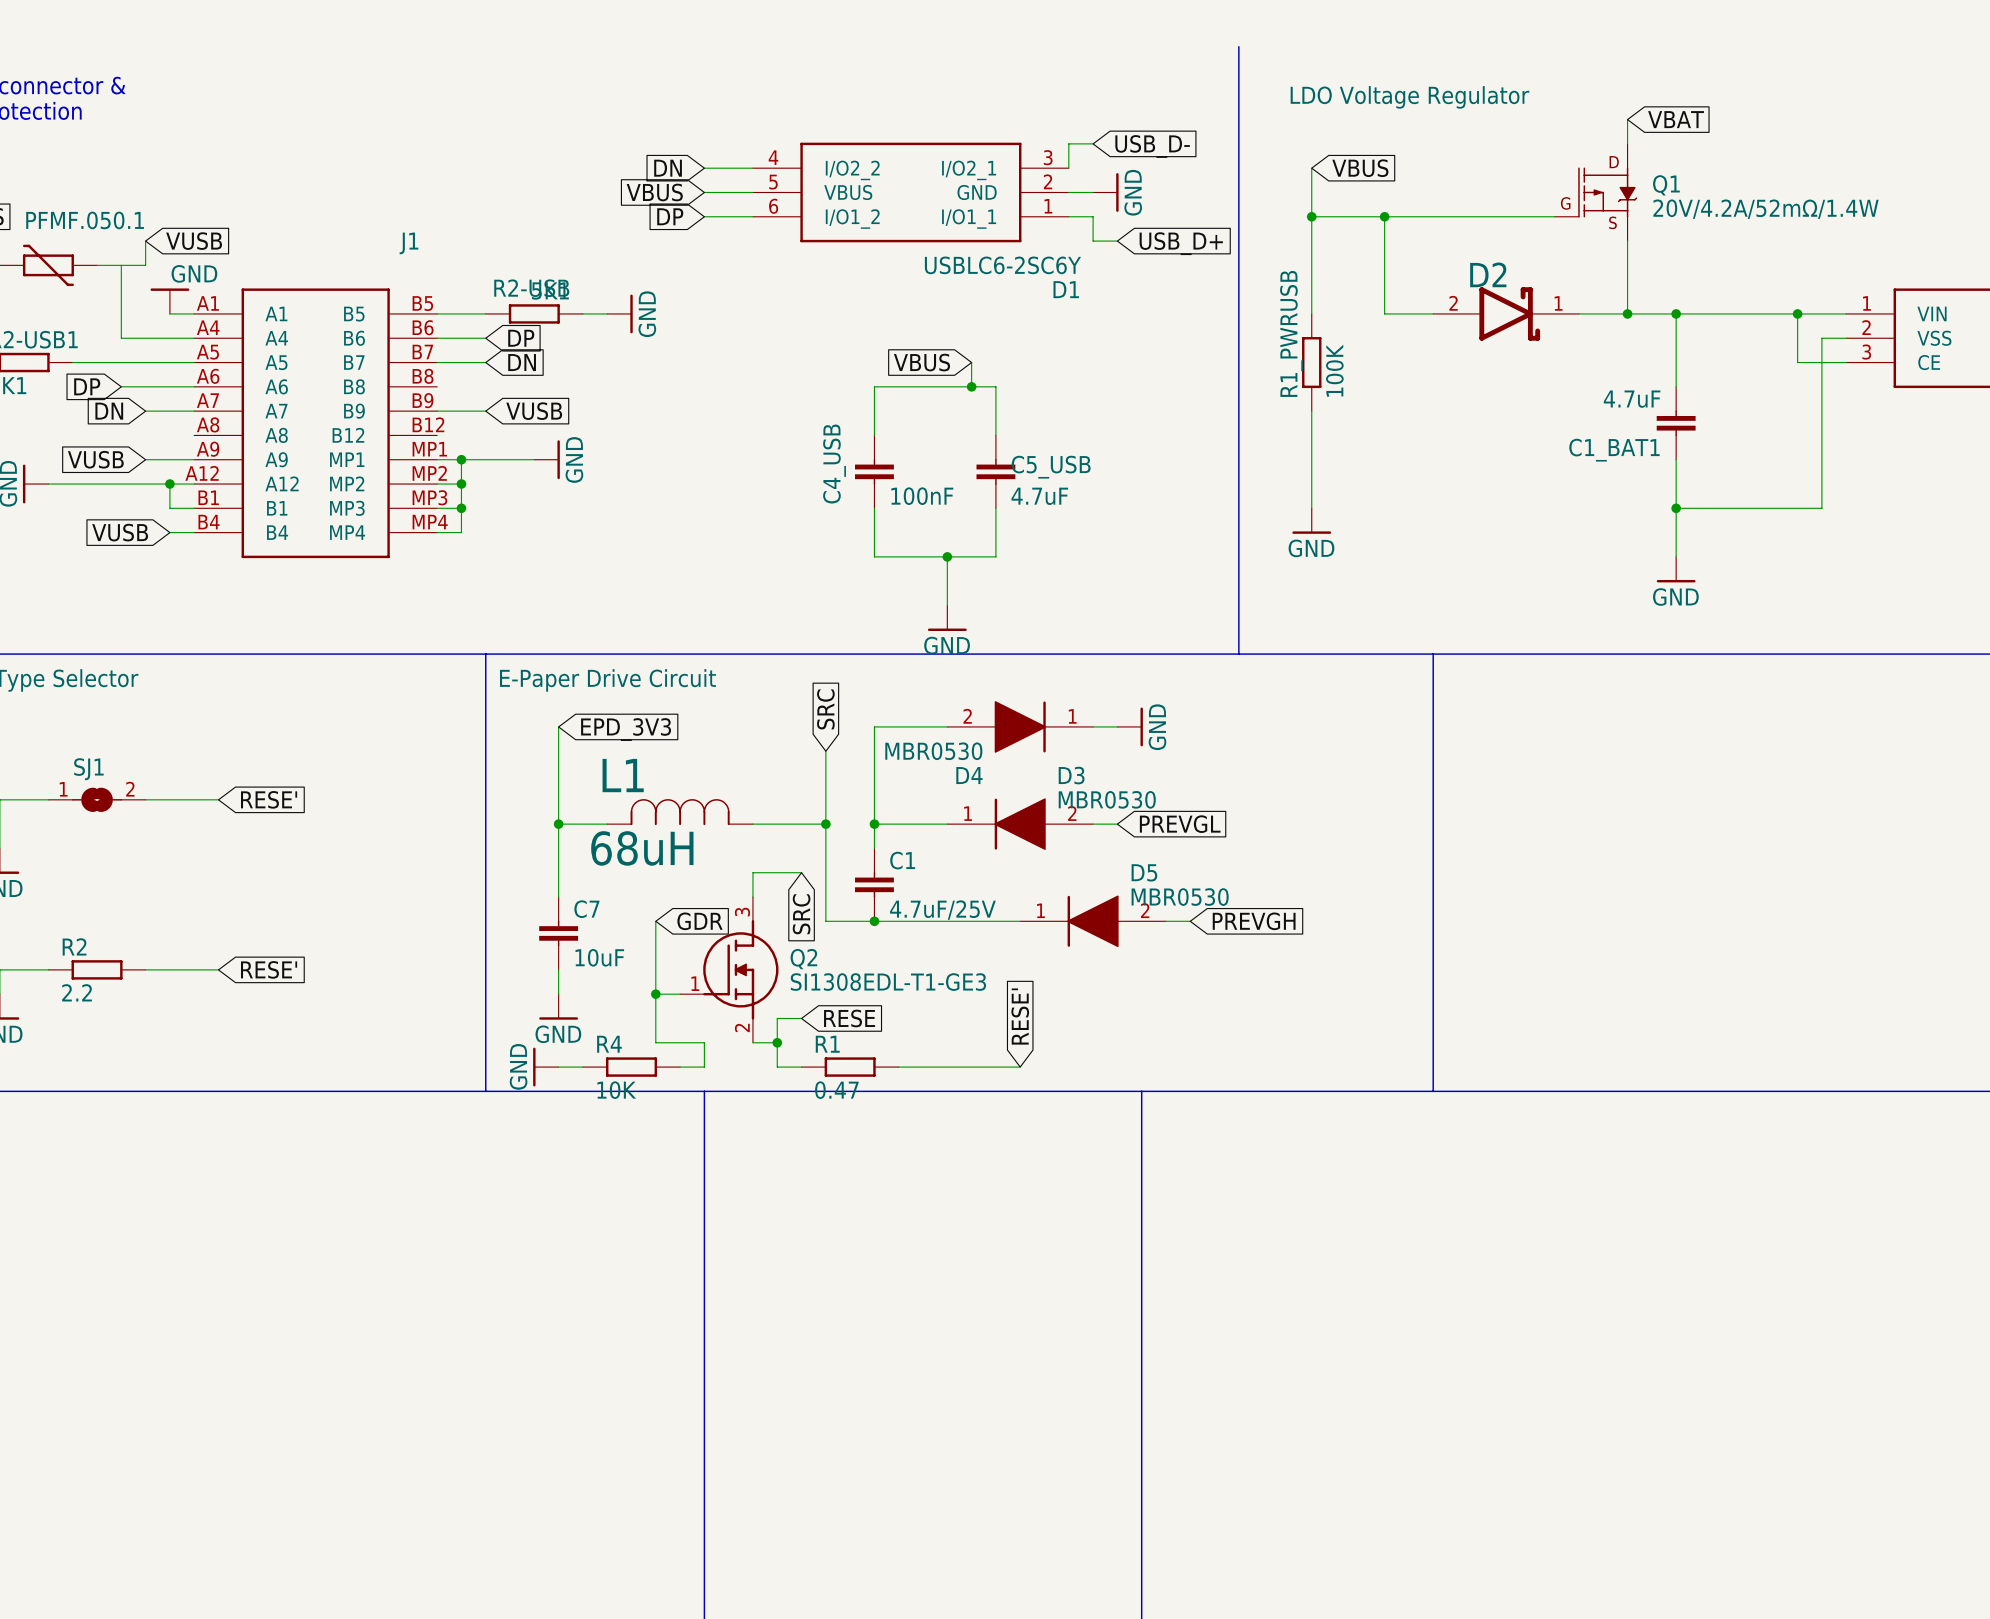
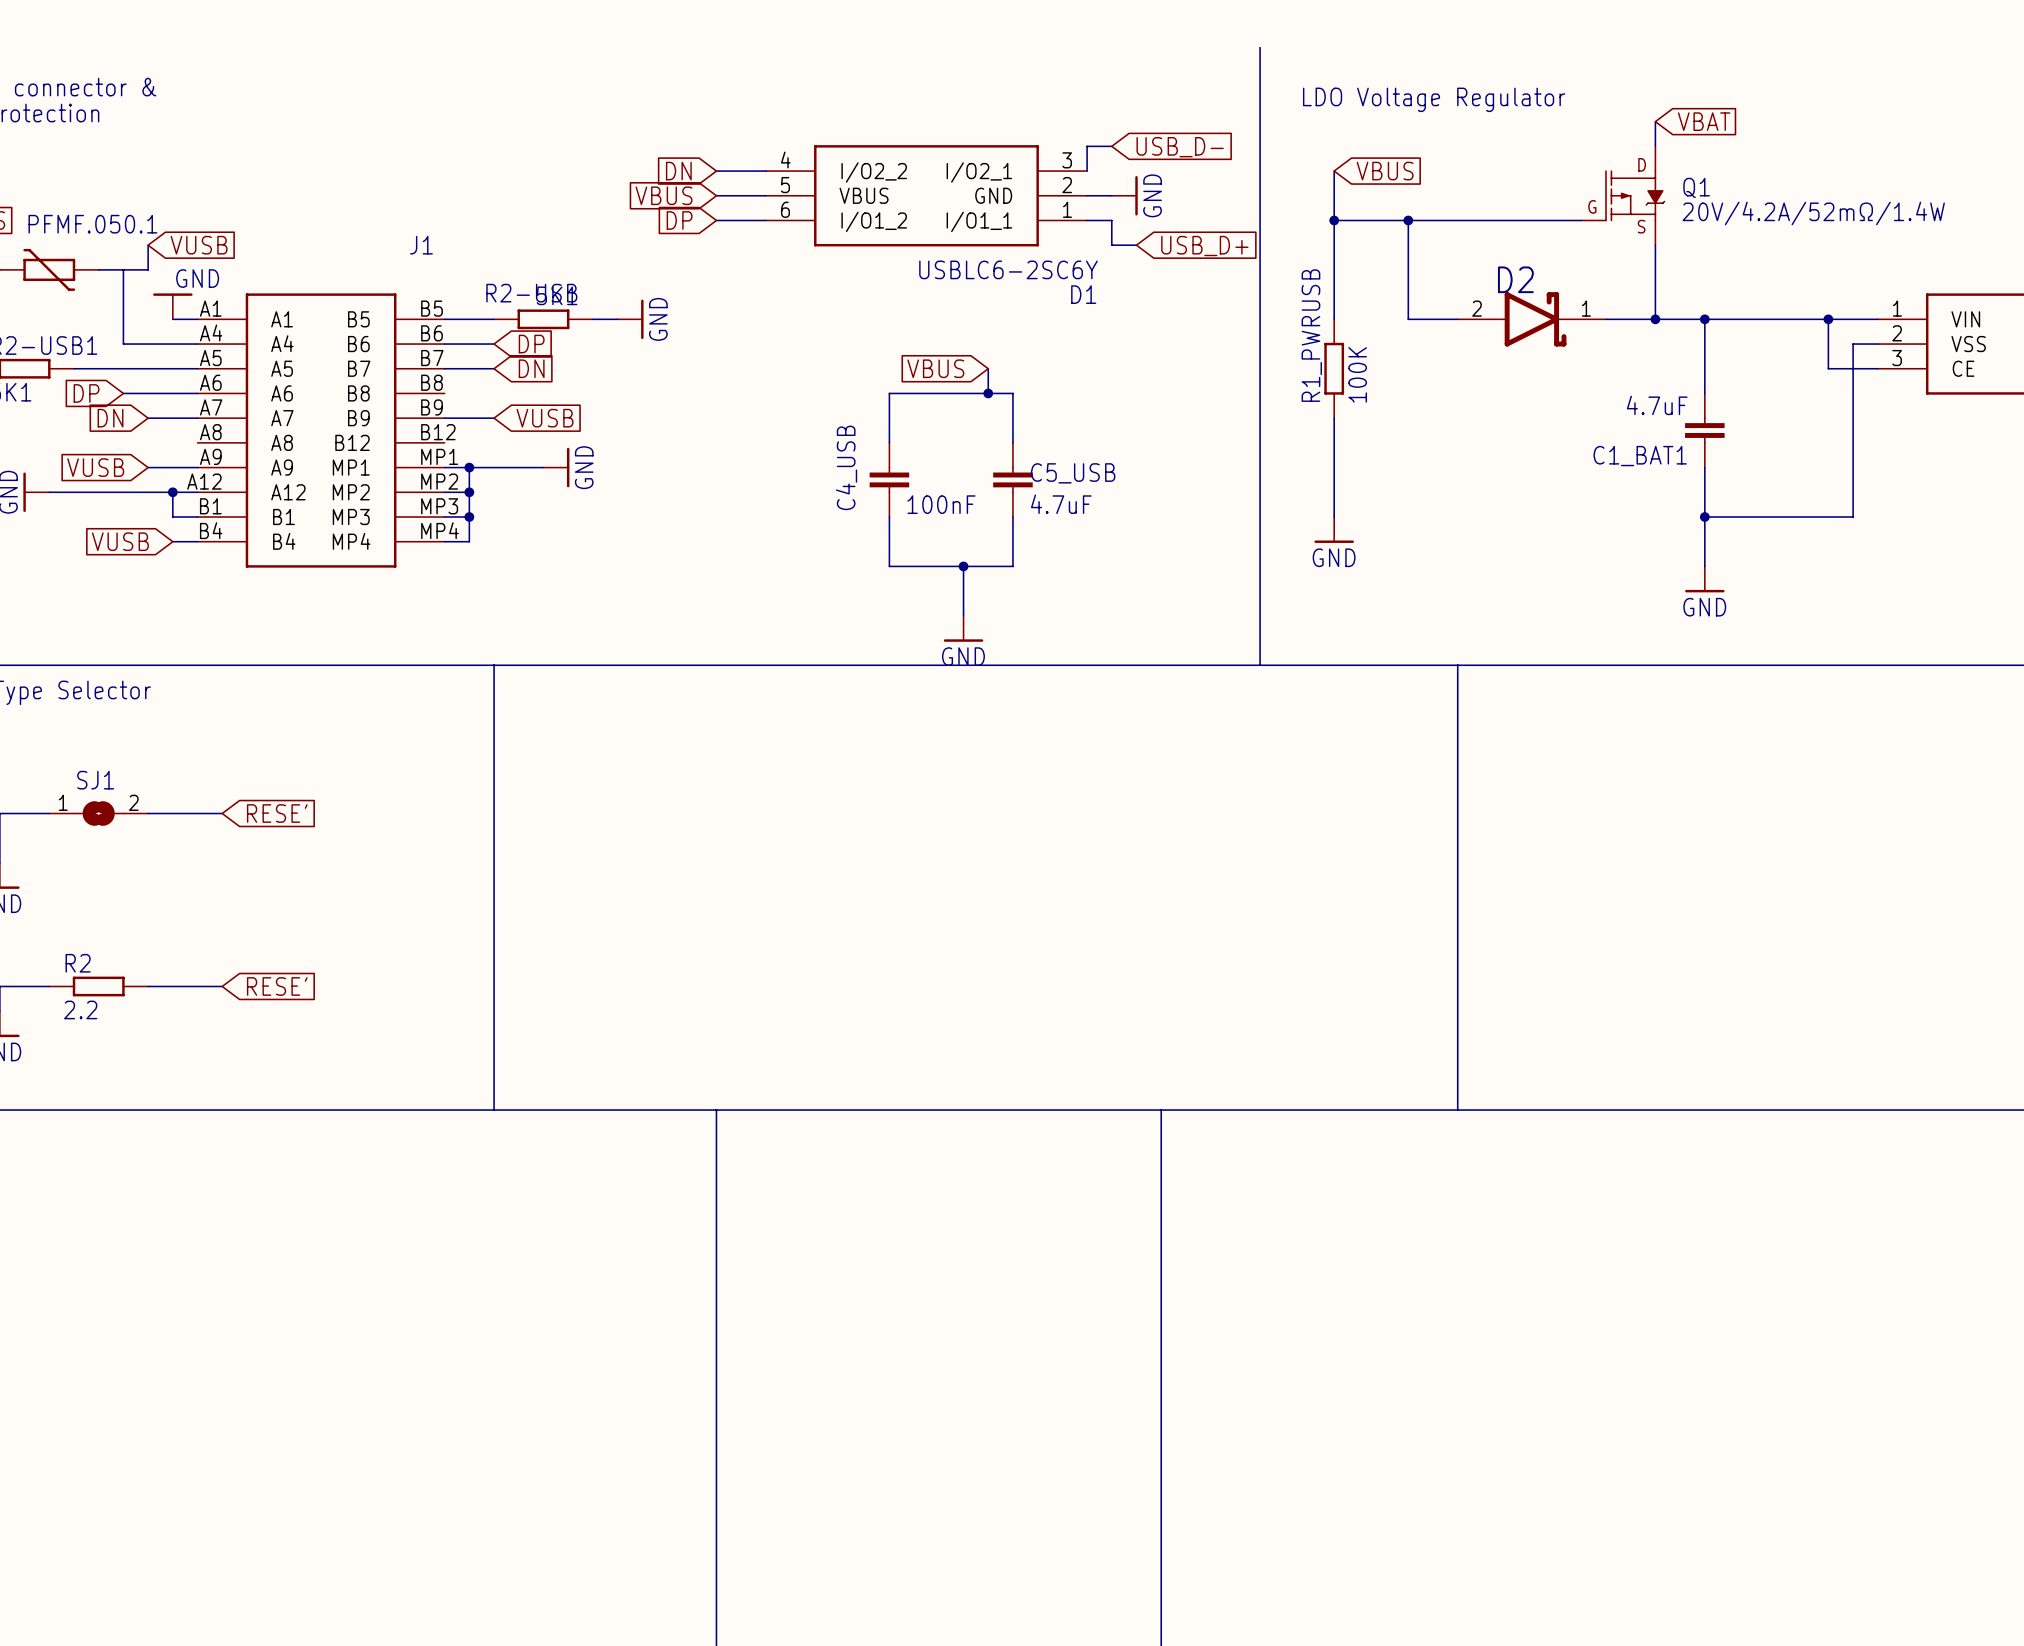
text: E-Paper Drive Circuit (607, 680) -> none
global label: SRC (825, 709) -> none
wire: (558, 726) (558, 897) -> none
wire: (947, 726) (874, 726) (874, 848) -> none
D4: MBR0530 (1020, 726) -> none
wire: (1093, 726) (1117, 726) -> none
power symbol: GND (1130, 726) -> none
global label: EPD_3V3 (626, 729) -> none
wire: (825, 751) (825, 921) (1020, 921) -> none
L1: 68uH (680, 812) -> none
wire: (558, 824) (607, 824) -> none
junction: (558, 824) -> none
wire: (752, 824) (825, 824) -> none
junction: (825, 824) -> none
wire: (874, 824) (947, 824) -> none
junction: (874, 824) -> none
D3: MBR0530 (1020, 824) -> none
wire: (1093, 824) (1117, 824) -> none
global label: PREVGL (1180, 824) -> none
wire: (801, 872) (752, 872) (752, 897) -> none
C1: 4.7uF/25V (874, 884) -> none
global label: SRC (801, 914) -> none
wire: (655, 921) (655, 1042) (704, 1042) (704, 1067) (680, 1067) -> none
global label: GDR (700, 921) -> none
junction: (874, 921) -> none
D5: MBR0530 (1093, 921) -> none
wire: (1165, 921) (1190, 921) -> none
global label: PREVGH (1254, 921) -> none
C7: 10uF (558, 933) -> none
wire: (558, 969) (558, 994) -> none
Q2: SI1308EDL-T1-GE3 (729, 969) -> none
wire: (655, 994) (680, 994) -> none
junction: (655, 994) -> none
power symbol: GND (558, 1006) -> none
global label: RESE' (1020, 1016) -> none
wire: (801, 1018) (777, 1018) (777, 1067) (801, 1067) -> none
global label: RESE (849, 1018) -> none
wire: (752, 1042) (777, 1042) -> none
junction: (777, 1042) -> none
power symbol: GND (545, 1067) -> none
wire: (558, 1067) (582, 1067) -> none
R4: 10K (631, 1067) -> none
R1: 0.47 (850, 1067) -> none
wire: (898, 1067) (1020, 1067) -> none

